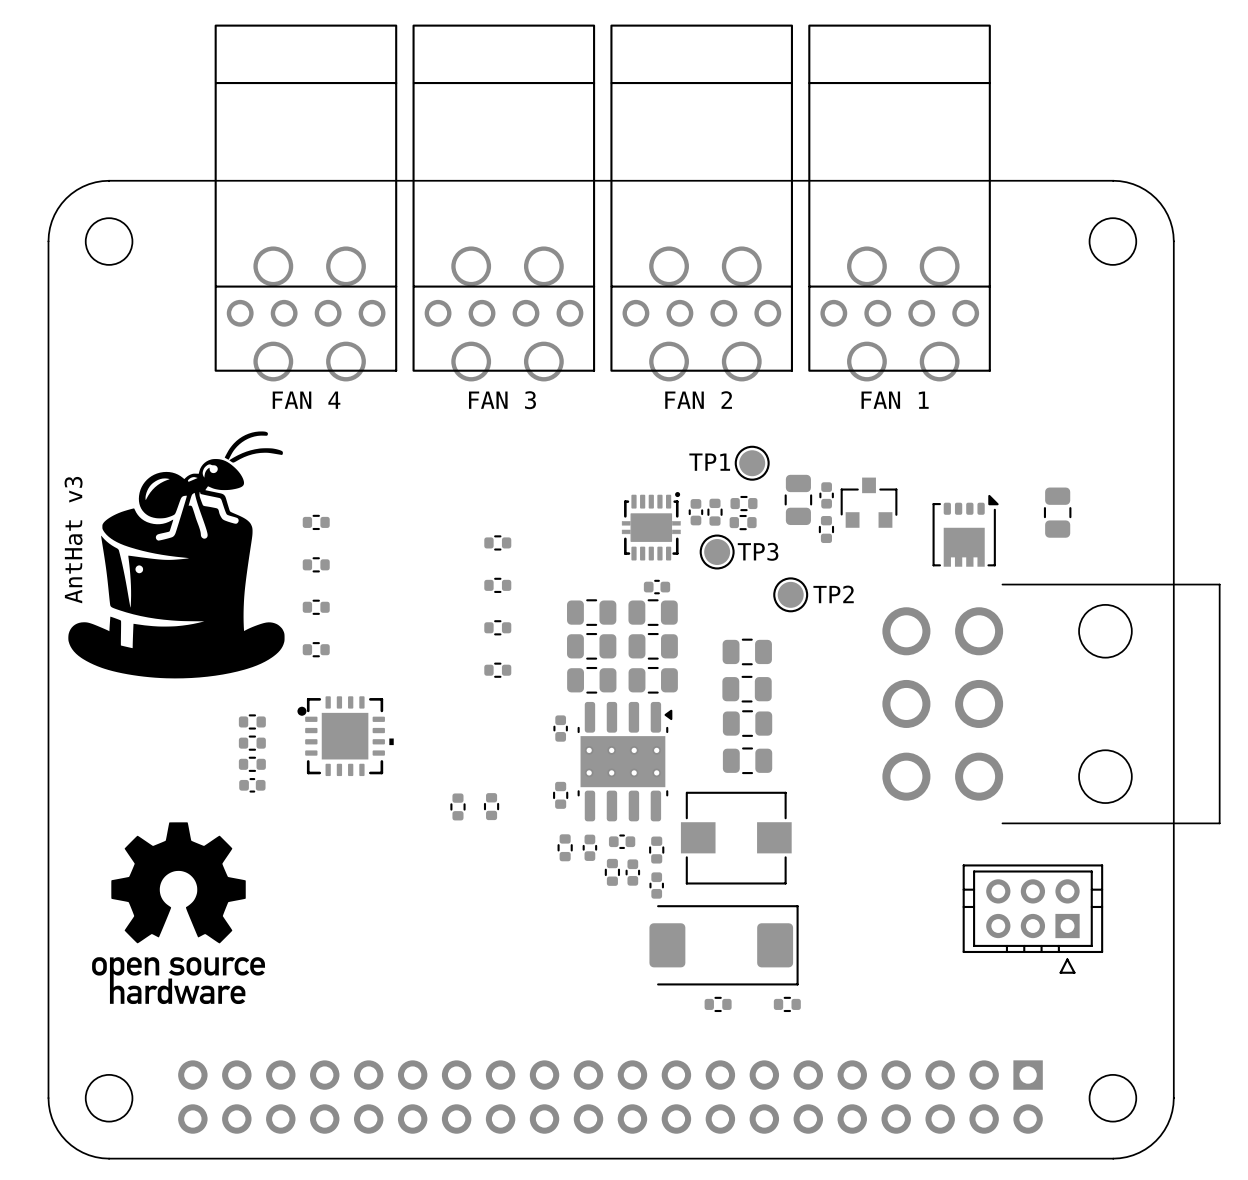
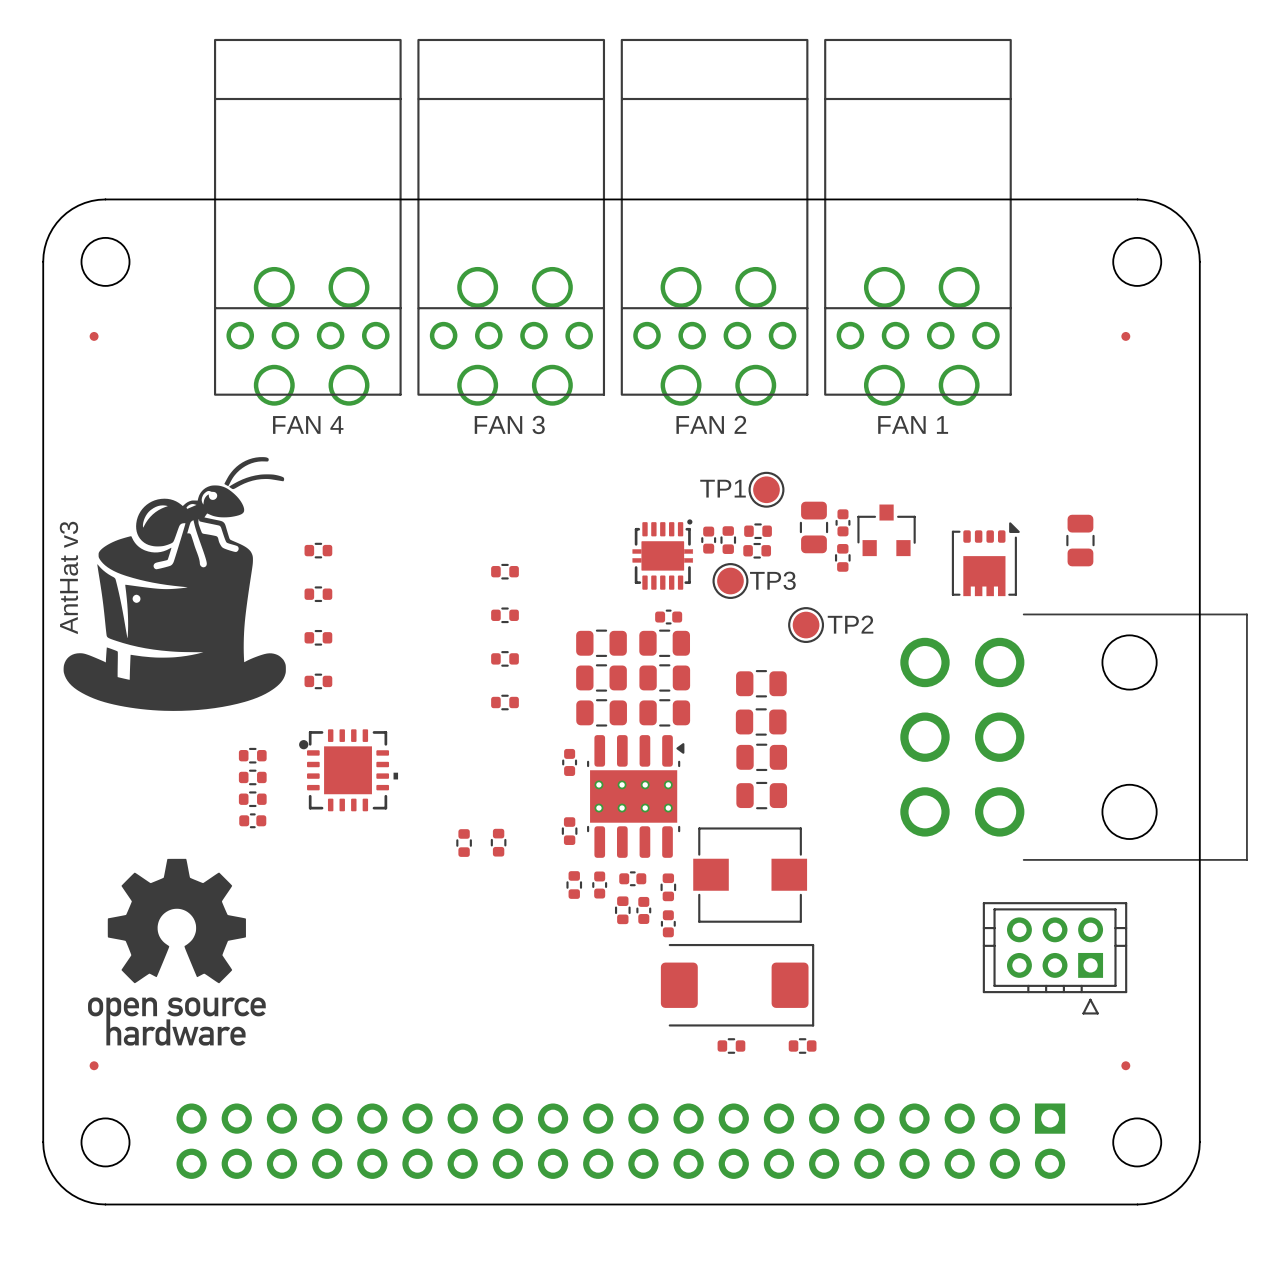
part: none -> (94, 336)
part: none -> (1125, 336)
part: none -> (94, 1065)
part: none -> (1125, 1065)

